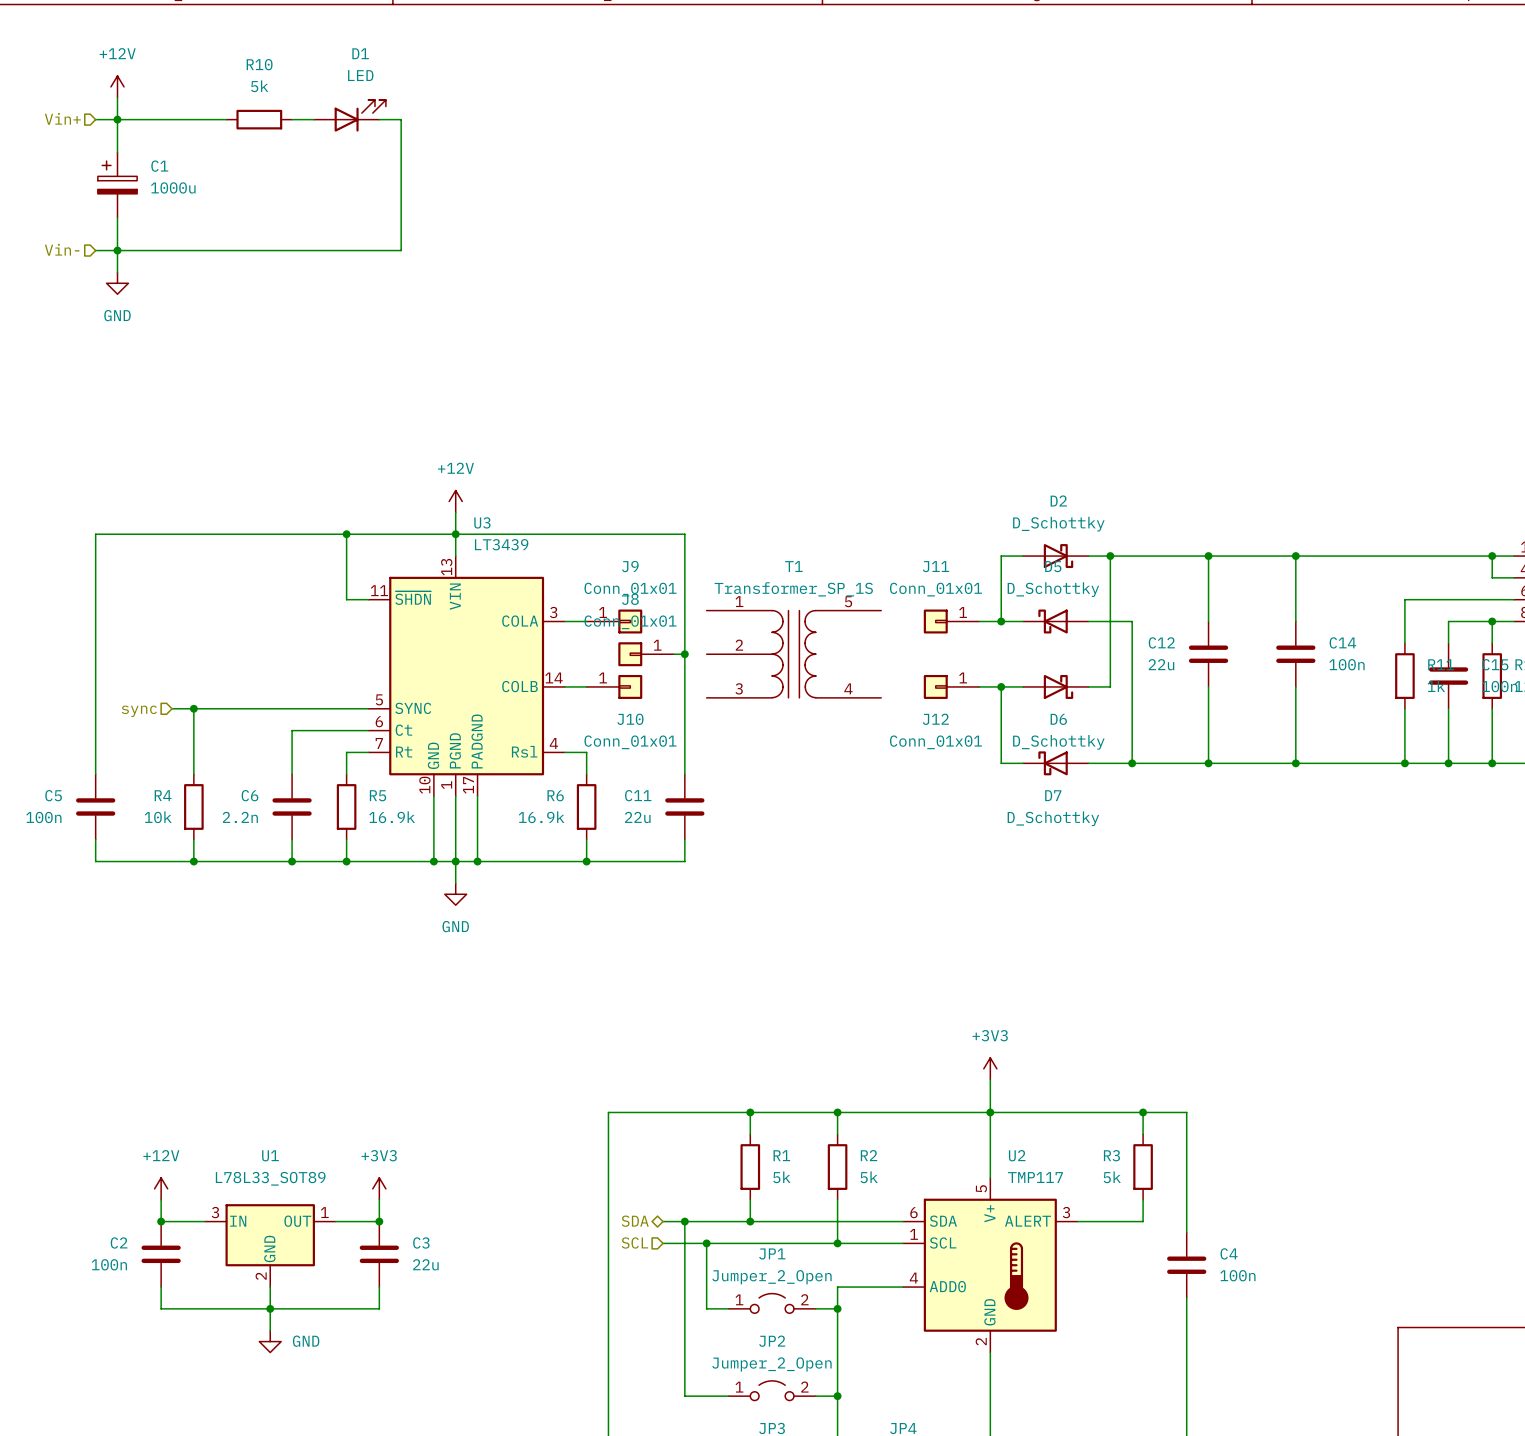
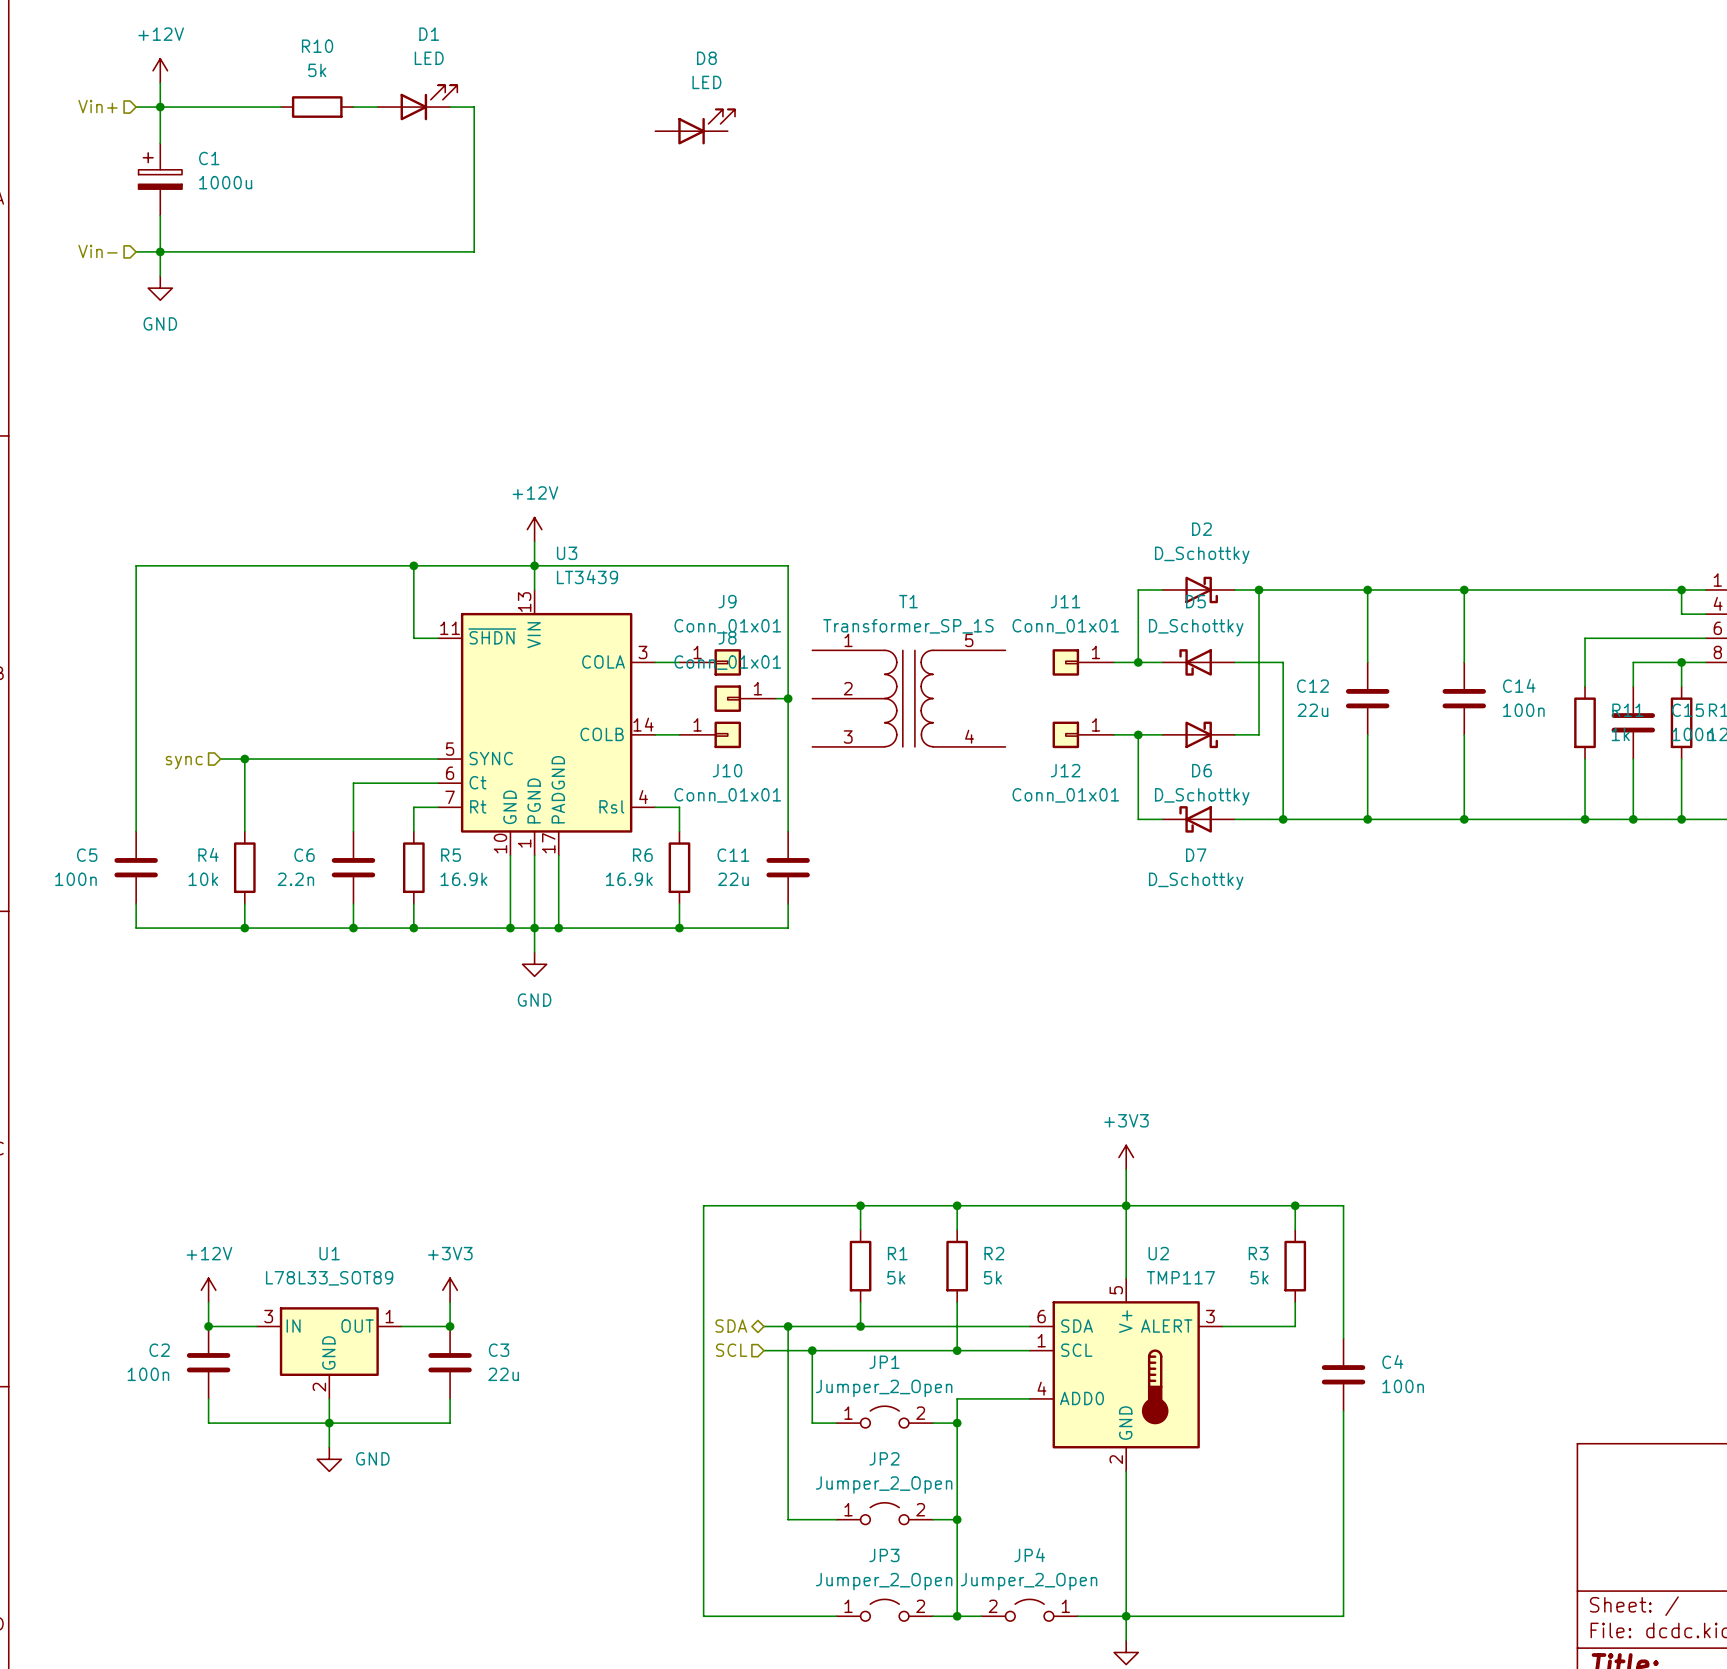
D8: none -> LED (695, 126)

